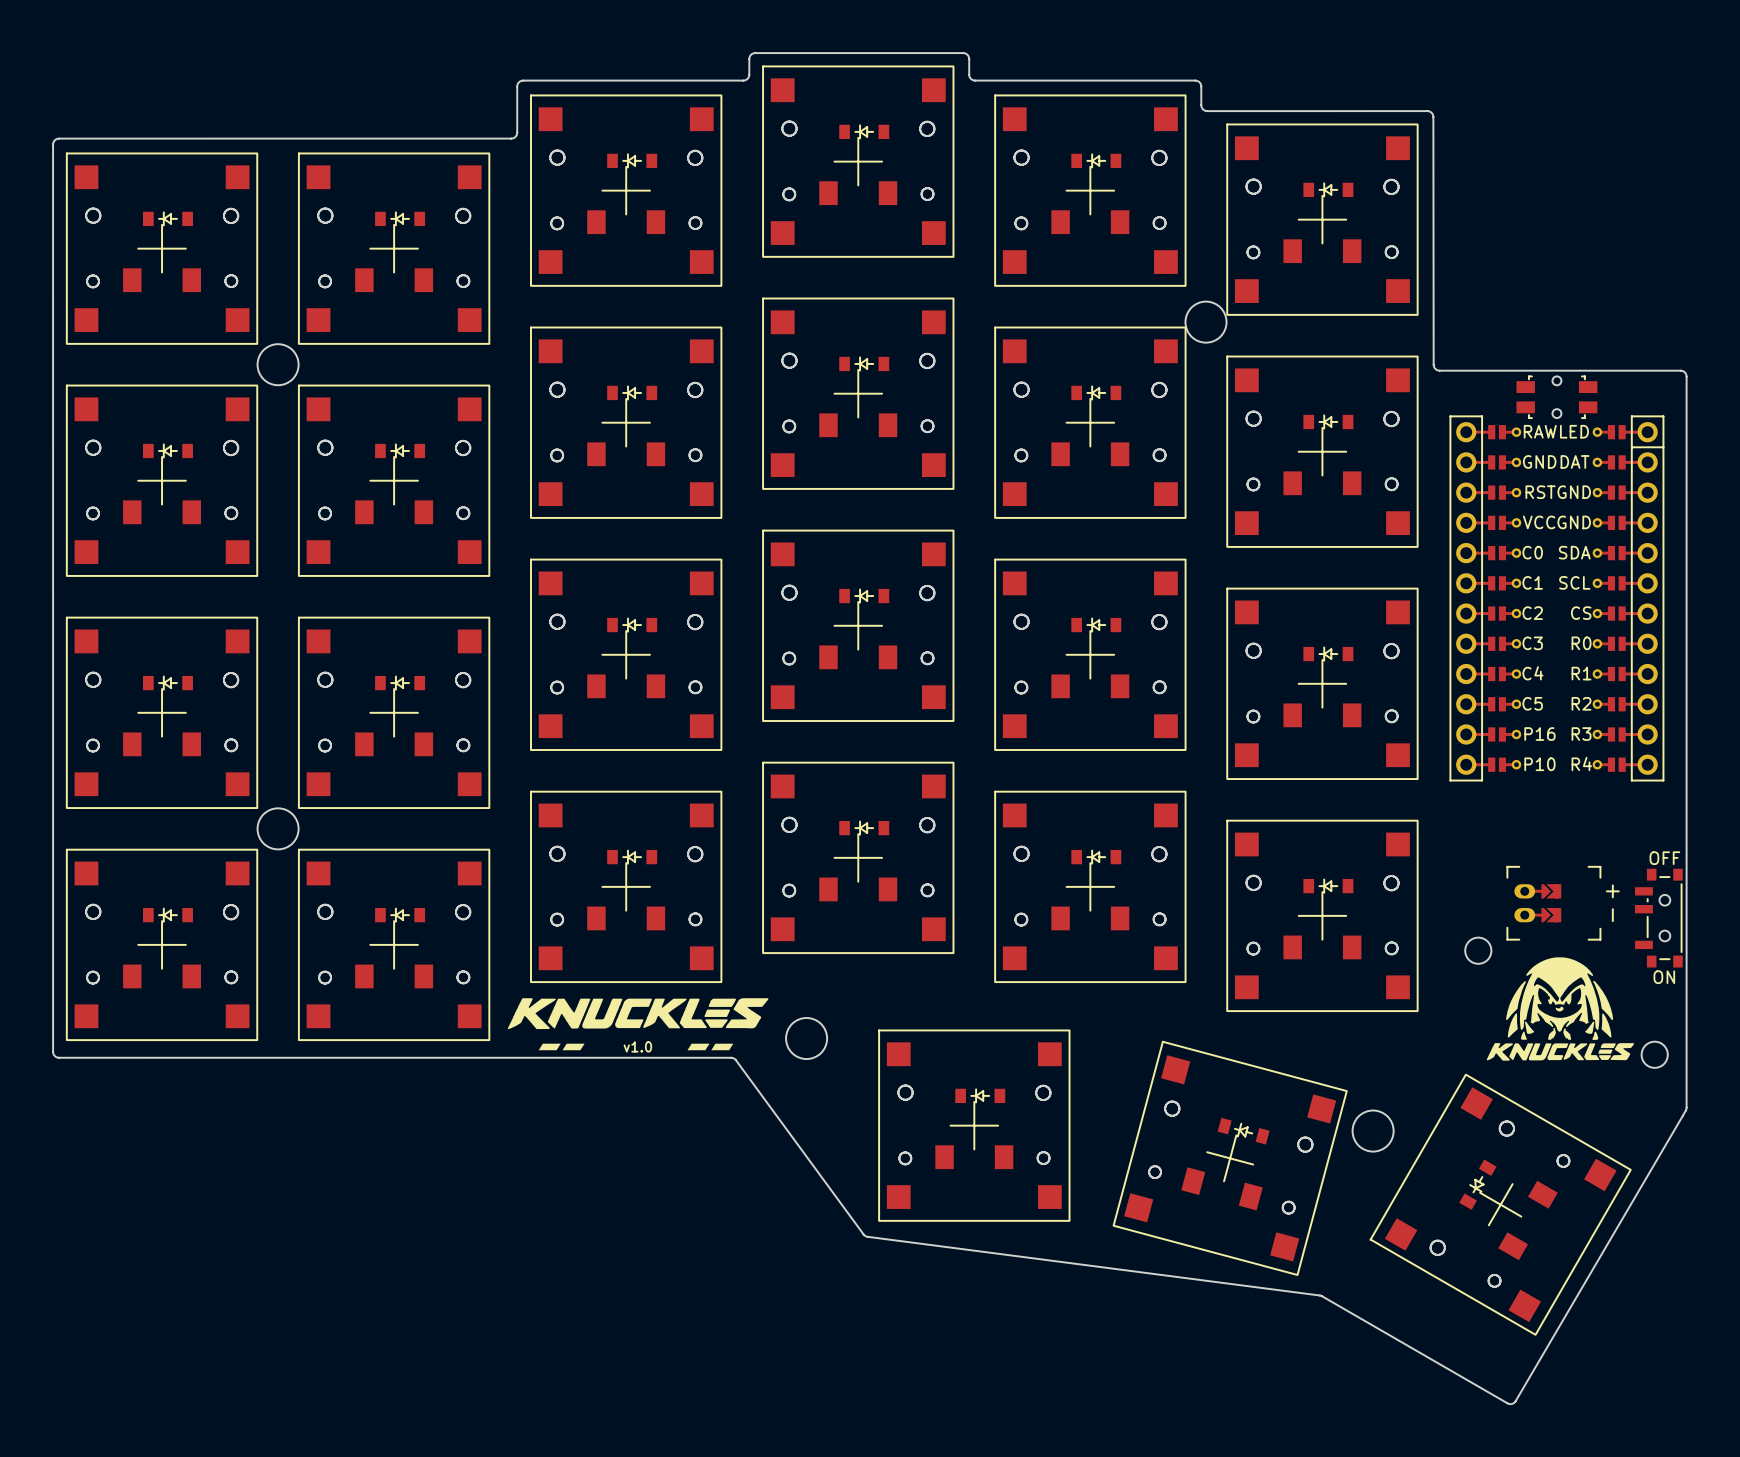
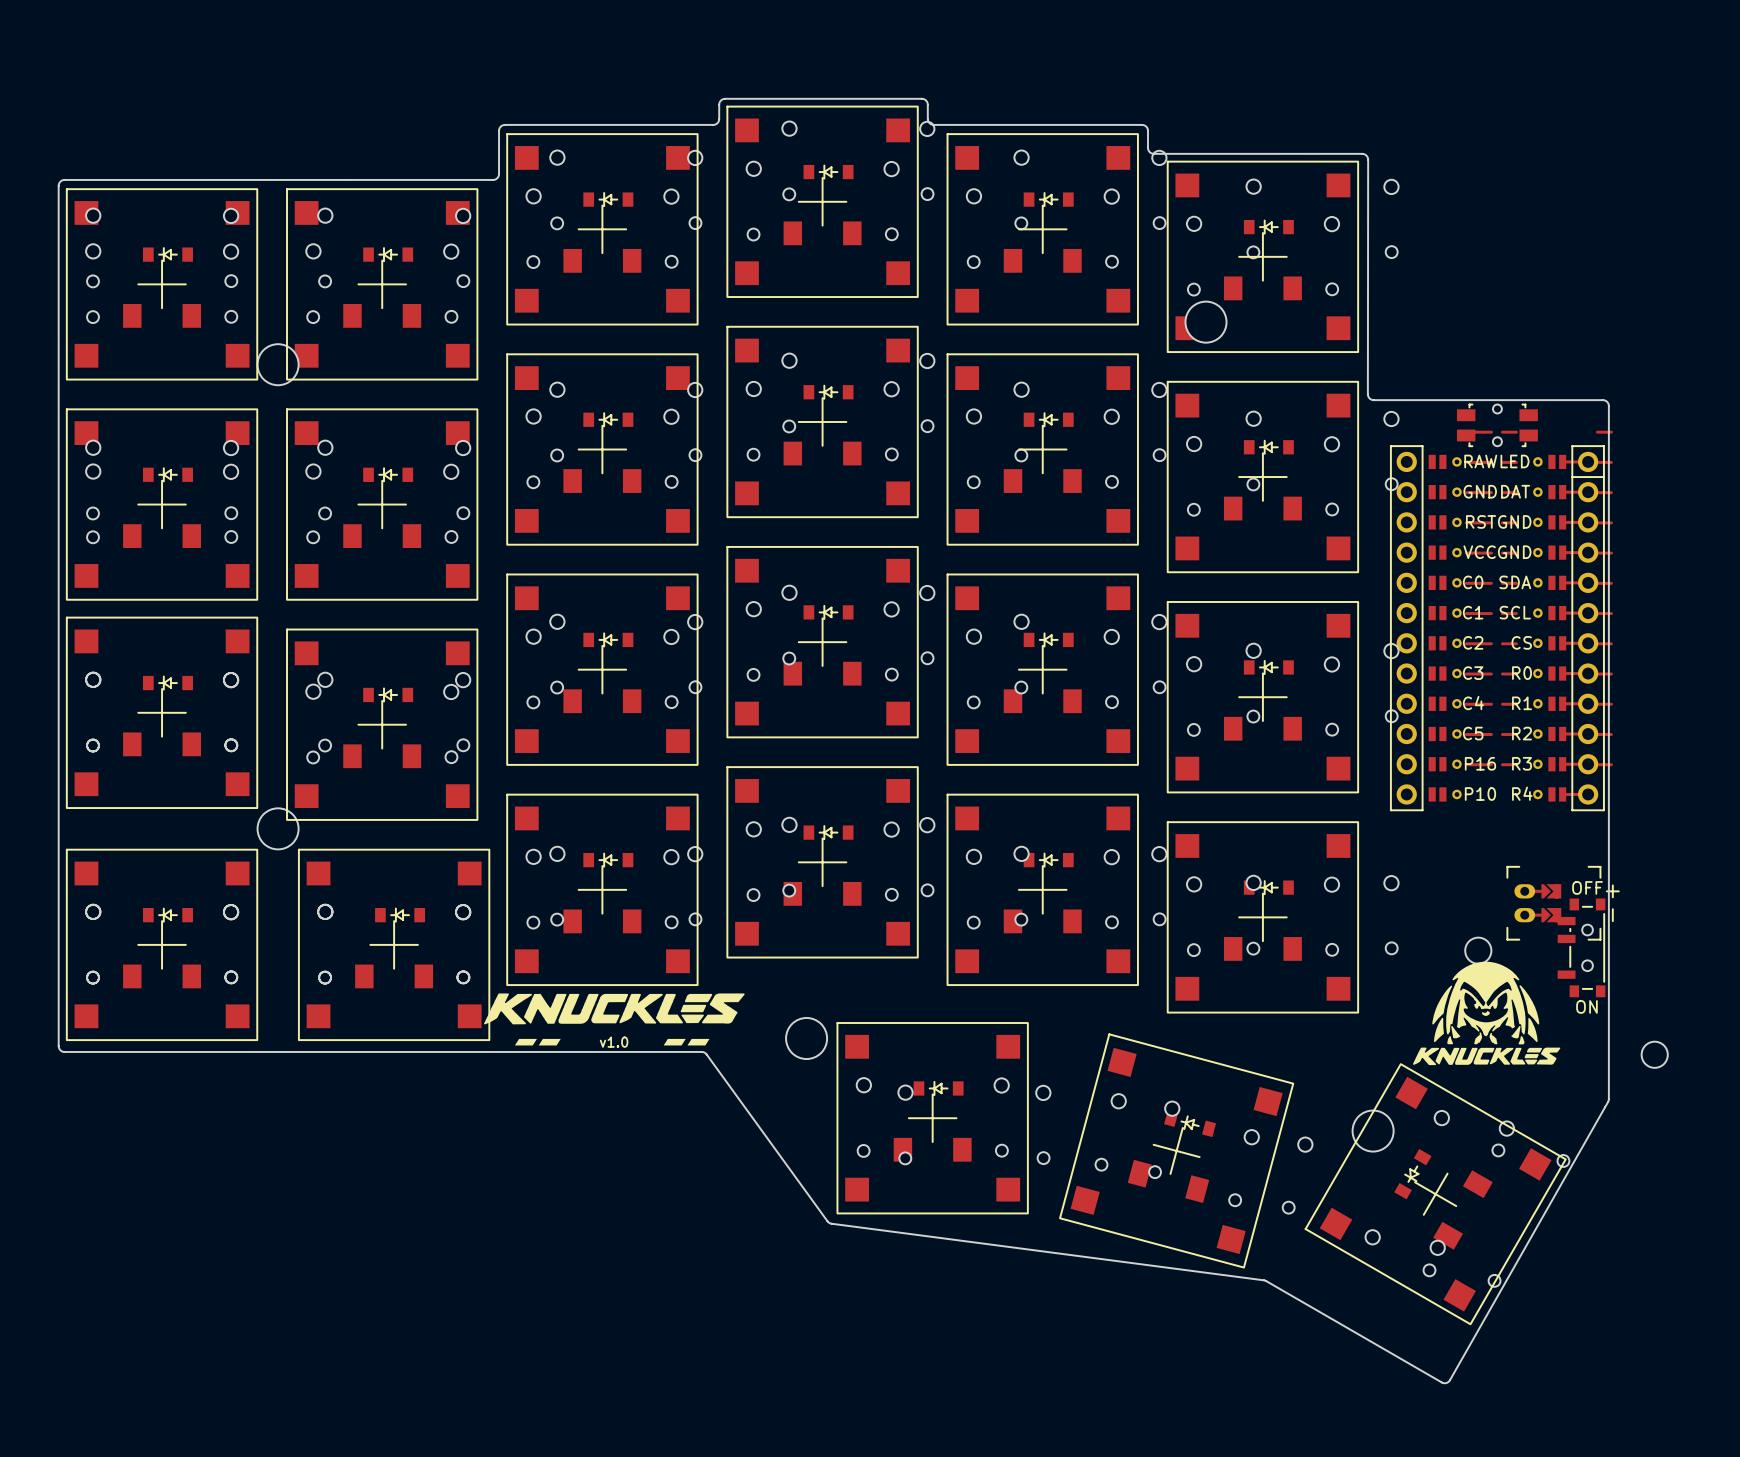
board edge: (755, 53) (963, 53) (968, 57) (969, 75) (974, 80) (1196, 80) (1201, 85) (1201, 107) (1206, 111) (1429, 111) (1433, 117) (1433, 364) (1435, 368) (1439, 370) (1680, 370) (1685, 373) (1686, 1108) (1513, 1403) (1507, 1403) (1320, 1295) (865, 1236) (732, 1057) (59, 1057) (53, 1054) (53, 141) (59, 138) (512, 138) (517, 133) (517, 85) (521, 80) (744, 80) (749, 75) (749, 57) (755, 53) -> (725, 98) (719, 102) (719, 120) (713, 124) (503, 125) (499, 130) (498, 174) (493, 179) (64, 179) (59, 182) (59, 1049) (64, 1051) (703, 1052) (829, 1223) (1264, 1280) (1441, 1382) (1447, 1382) (1608, 1099) (1607, 402) (1602, 400) (1373, 400) (1369, 398) (1367, 394) (1368, 159) (1364, 154) (1153, 153) (1148, 149) (1147, 128) (1142, 124) (933, 124) (927, 120) (927, 102) (922, 98) (725, 98)
part position: (864, 131) -> (828, 172)
part footprint: [66, 152, 258, 345] -> [142, 247, 193, 262]
part footprint: [298, 152, 491, 345] -> [363, 247, 414, 262]
part position: (632, 160) -> (608, 199)
part position: (1096, 160) -> (1048, 199)
part position: (858, 161) -> (822, 201)
part position: (1328, 189) -> (1268, 227)
part position: (626, 190) -> (602, 229)
part position: (1090, 190) -> (1042, 229)
part: (167, 218) -> none
part: (400, 218) -> none
part position: (1322, 219) -> (1262, 256)
part: none -> (162, 284)
part: none -> (382, 284)
part position: (864, 363) -> (828, 392)
part footprint: [66, 384, 258, 577] -> [142, 467, 193, 482]
part footprint: [298, 384, 491, 577] -> [363, 467, 414, 482]
part position: (632, 392) -> (608, 419)
part position: (1096, 392) -> (1048, 419)
part position: (858, 393) -> (822, 421)
part position: (1556, 397) -> (1497, 425)
part position: (1328, 421) -> (1268, 447)
part position: (626, 422) -> (602, 449)
part position: (1090, 422) -> (1042, 449)
track: (1622, 432) (1647, 432) -> (1562, 461) (1588, 461)
part: (167, 450) -> none
part: (400, 450) -> none
part position: (1322, 451) -> (1262, 477)
track: (1622, 462) (1647, 462) -> (1562, 492) (1588, 492)
track: (1622, 492) (1647, 492) -> (1562, 522) (1588, 522)
part: none -> (162, 504)
part: none -> (382, 504)
track: (1622, 522) (1647, 522) -> (1562, 552) (1588, 552)
track: (1622, 553) (1647, 553) -> (1562, 582) (1588, 582)
track: (1622, 583) (1647, 583) -> (1562, 613) (1588, 613)
part position: (864, 596) -> (828, 612)
part position: (1556, 598) -> (1497, 628)
track: (1622, 613) (1647, 613) -> (1562, 643) (1588, 643)
part position: (632, 625) -> (608, 639)
part position: (858, 625) -> (822, 642)
part position: (1096, 625) -> (1048, 639)
track: (1622, 643) (1647, 643) -> (1562, 673) (1588, 673)
part position: (626, 654) -> (602, 669)
part position: (1090, 654) -> (1042, 669)
part position: (1328, 654) -> (1268, 667)
track: (1622, 674) (1647, 674) -> (1562, 703) (1588, 703)
part position: (400, 683) -> (388, 694)
part position: (1322, 683) -> (1262, 697)
track: (1622, 704) (1647, 704) -> (1562, 734) (1588, 734)
part position: (394, 712) -> (382, 724)
track: (1622, 734) (1647, 734) -> (1562, 764) (1588, 764)
track: (1622, 764) (1647, 764) -> (1562, 794) (1588, 794)
part position: (864, 828) -> (828, 832)
part position: (632, 857) -> (608, 860)
part position: (858, 857) -> (822, 862)
part position: (1096, 857) -> (1048, 860)
part position: (626, 886) -> (602, 889)
part position: (1090, 886) -> (1042, 889)
part position: (1328, 886) -> (1268, 887)
part position: (1322, 915) -> (1262, 917)
part position: (1658, 918) -> (1581, 947)
drawing position: (1560, 1008) -> (1486, 1013)
drawing position: (638, 1024) -> (614, 1019)
text position: v1.0 (637, 1046) -> v1.0 (614, 1042)
part position: (980, 1095) -> (938, 1088)
part position: (974, 1125) -> (932, 1118)
part position: (1243, 1131) -> (1190, 1123)
part position: (1230, 1158) -> (1176, 1150)
part position: (1477, 1184) -> (1412, 1174)
part position: (1500, 1204) -> (1435, 1194)

